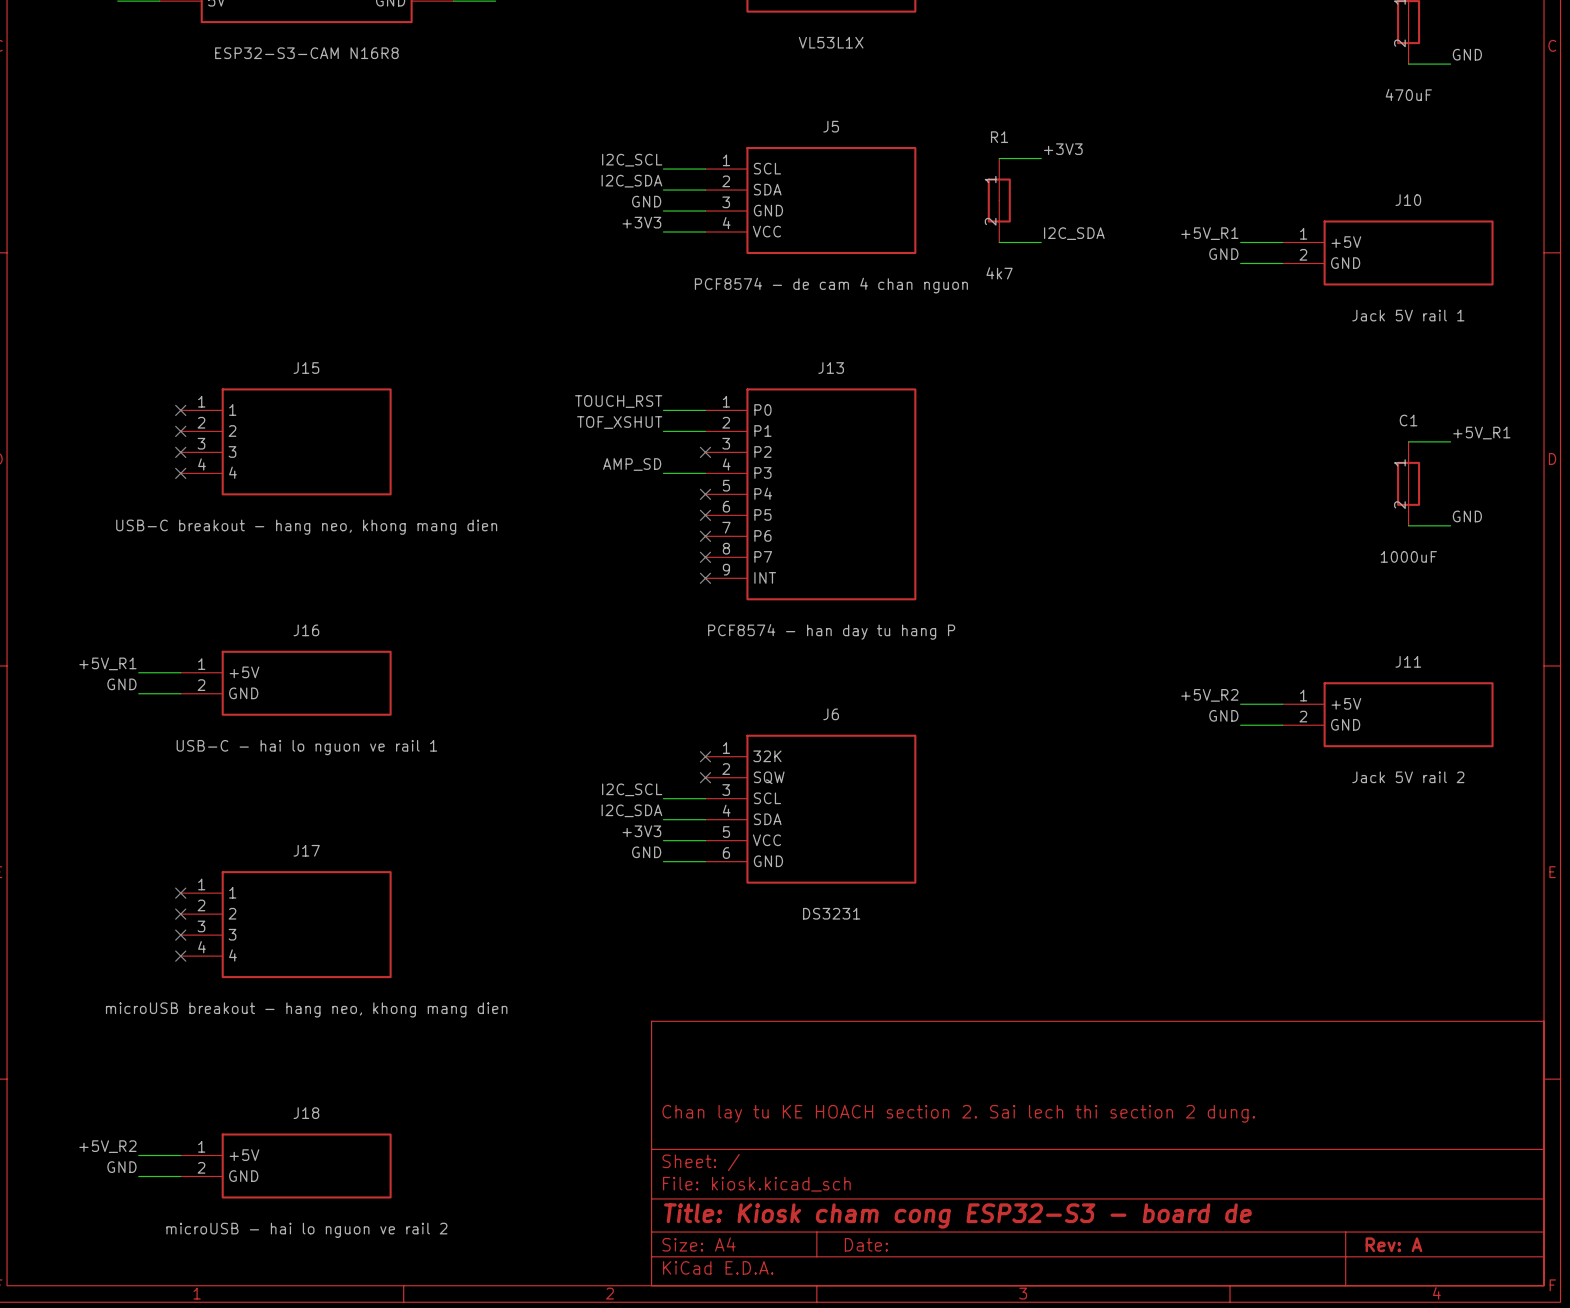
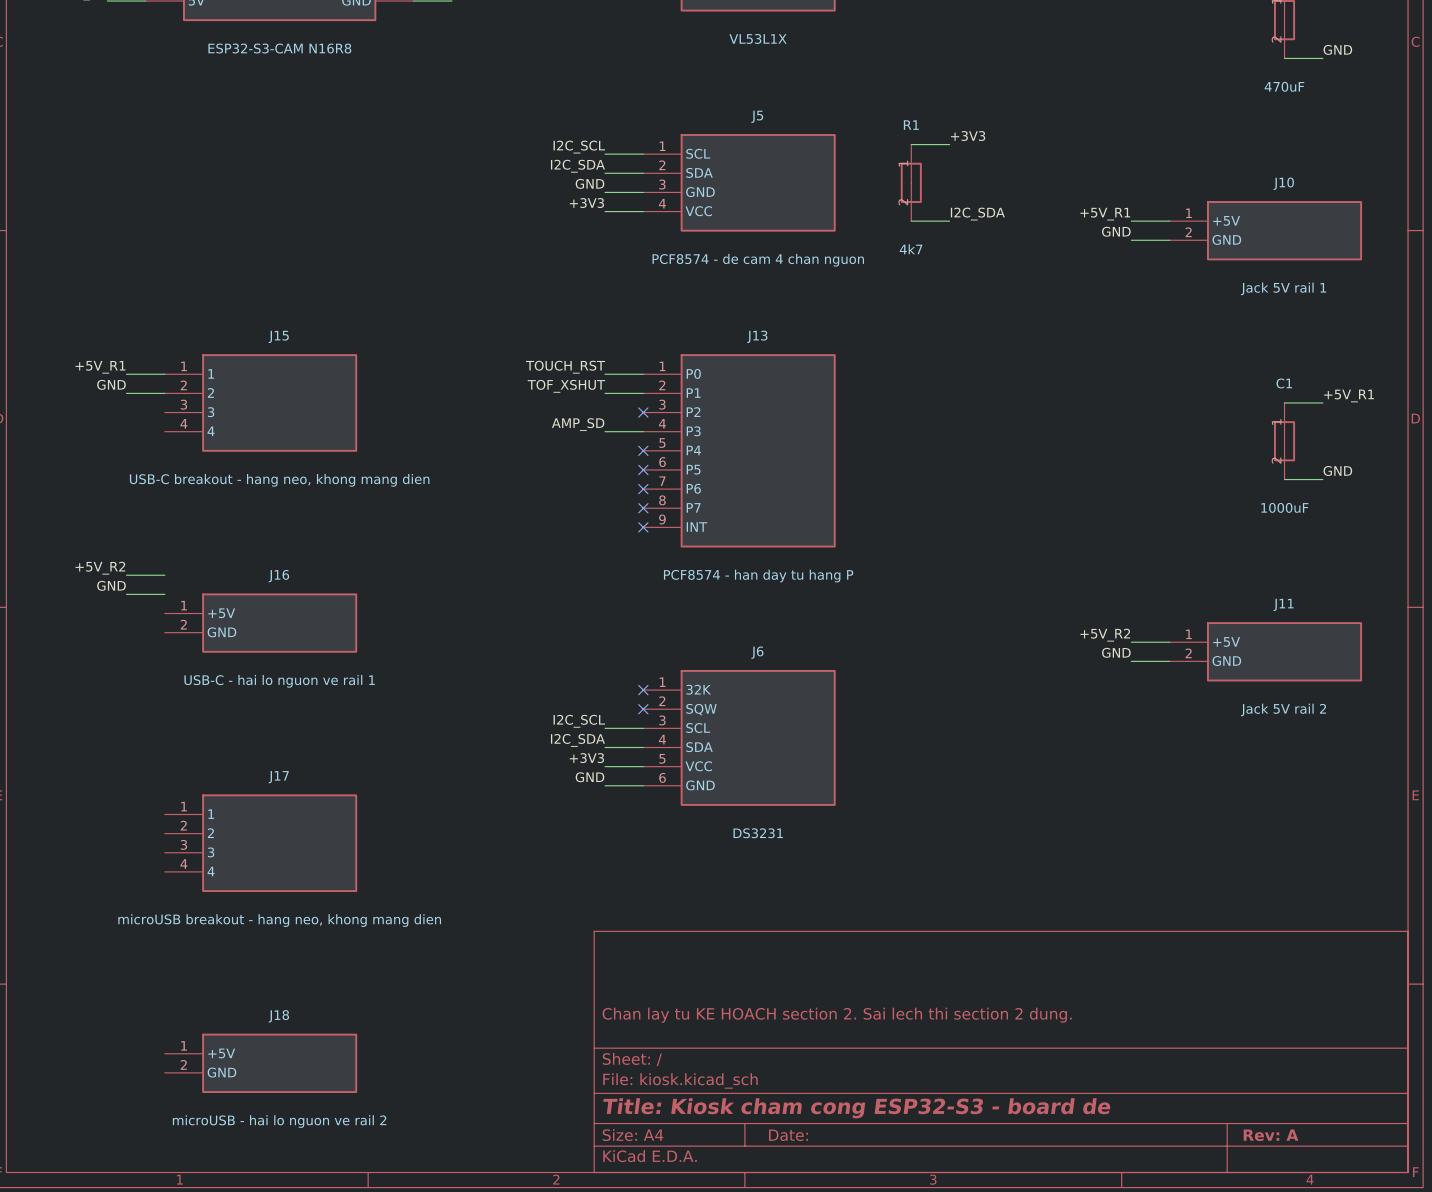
label: none -> +5V_R1 (100, 367)
wire: none -> (126, 374) (164, 374)
no-connect mark: (180, 410) -> none
label: none -> GND (111, 384)
wire: none -> (126, 393) (164, 393)
no-connect mark: (180, 431) -> none
no-connect mark: (180, 452) -> none
no-connect mark: (180, 473) -> none
label: none -> +5V_R2 (100, 568)
label: +5V_R1 (107, 663) -> none
wire: (138, 672) (180, 672) -> (126, 575) (164, 575)
label position: GND (121, 684) -> GND (111, 585)
wire: (138, 693) (180, 693) -> (126, 594) (164, 594)
no-connect mark: (180, 893) -> none
no-connect mark: (180, 914) -> none
no-connect mark: (180, 935) -> none
no-connect mark: (180, 956) -> none
label: +5V_R2 (107, 1146) -> none
wire: (138, 1155) (180, 1155) -> none
label: GND (121, 1167) -> none
wire: (138, 1176) (180, 1176) -> none

